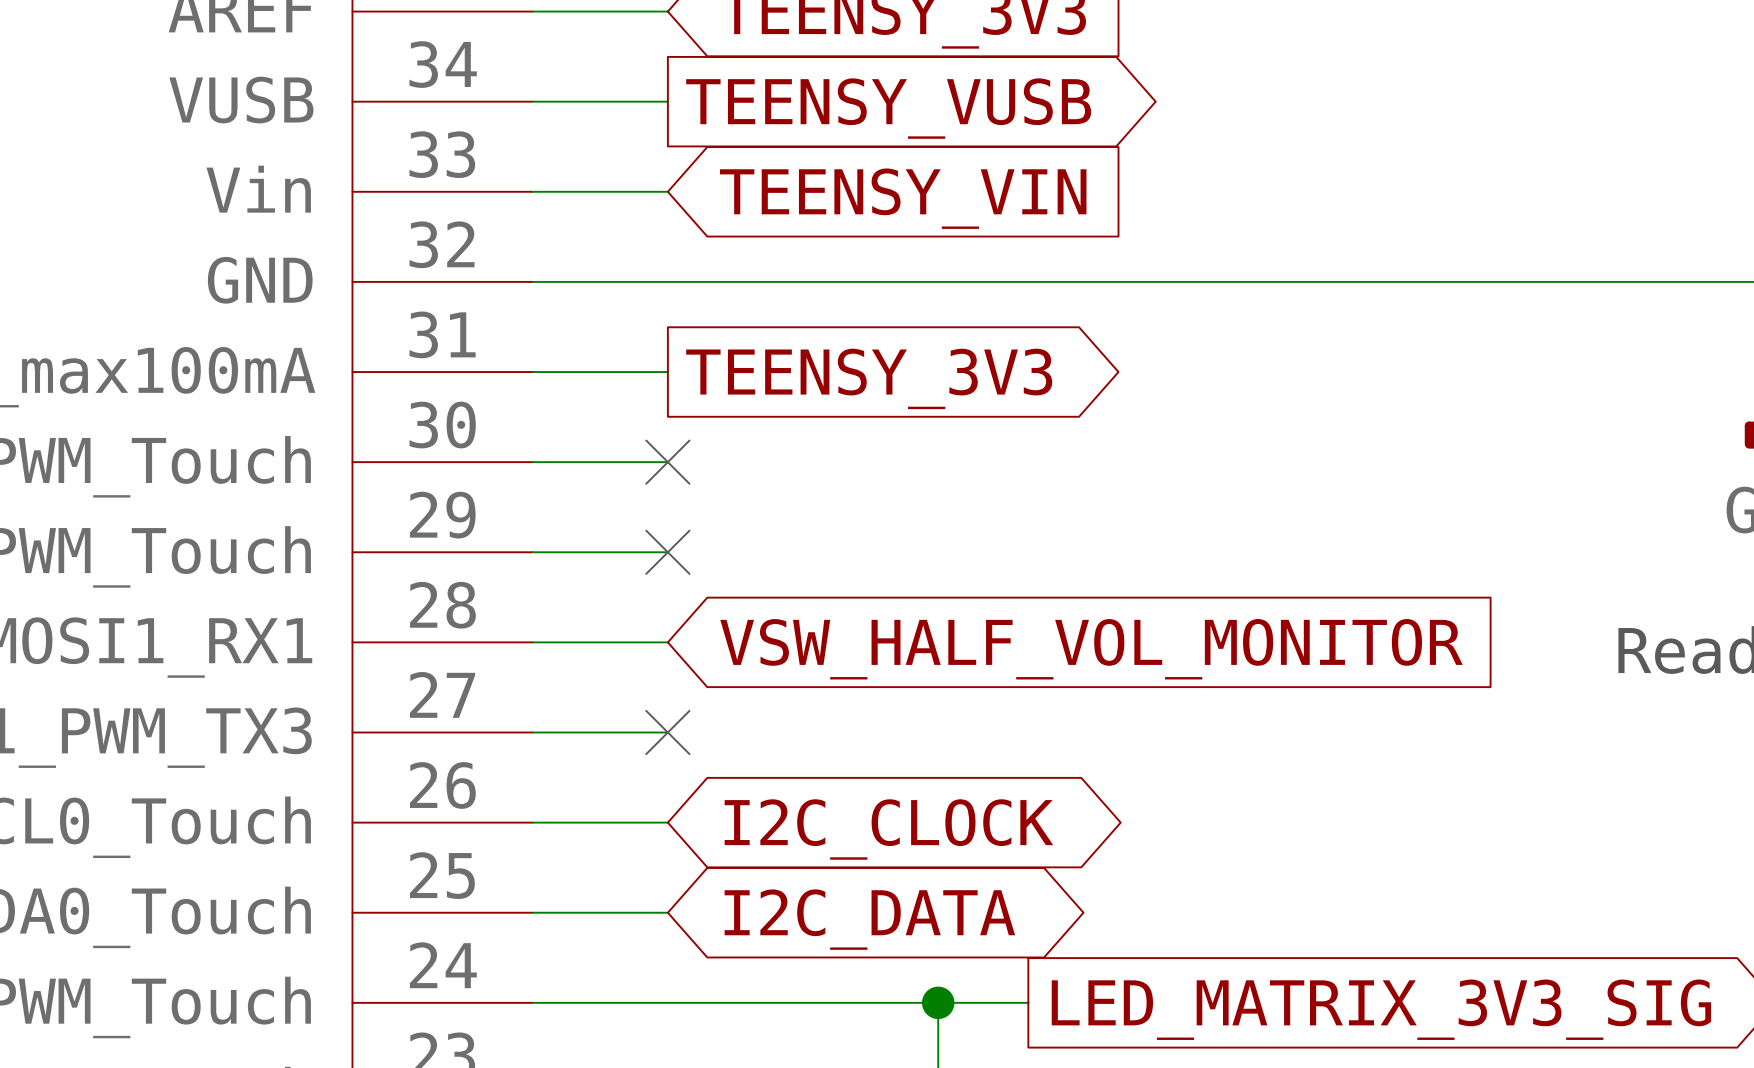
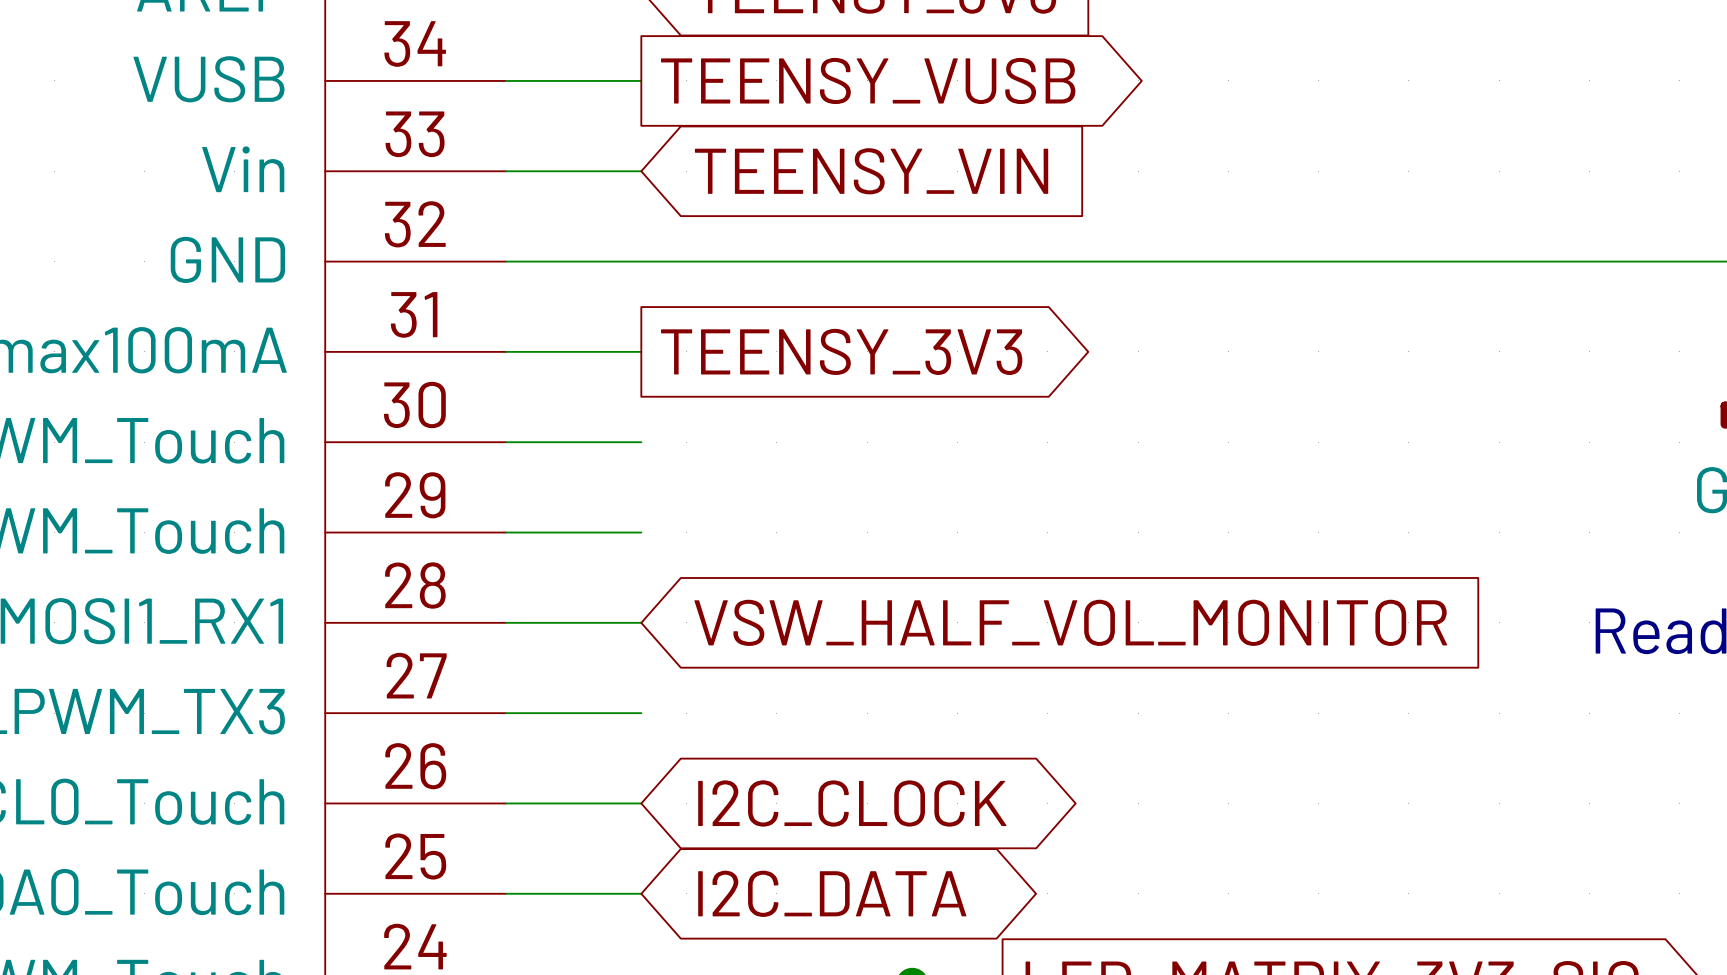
no-connect mark: (667, 462) -> none
no-connect mark: (667, 552) -> none
no-connect mark: (667, 732) -> none

